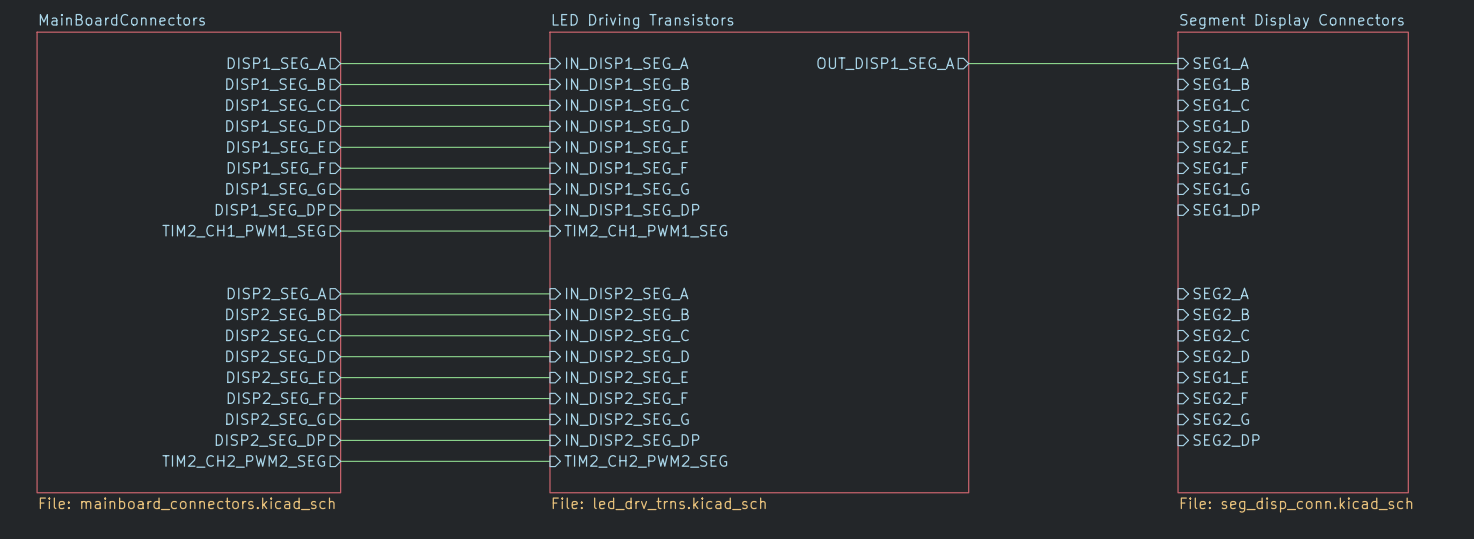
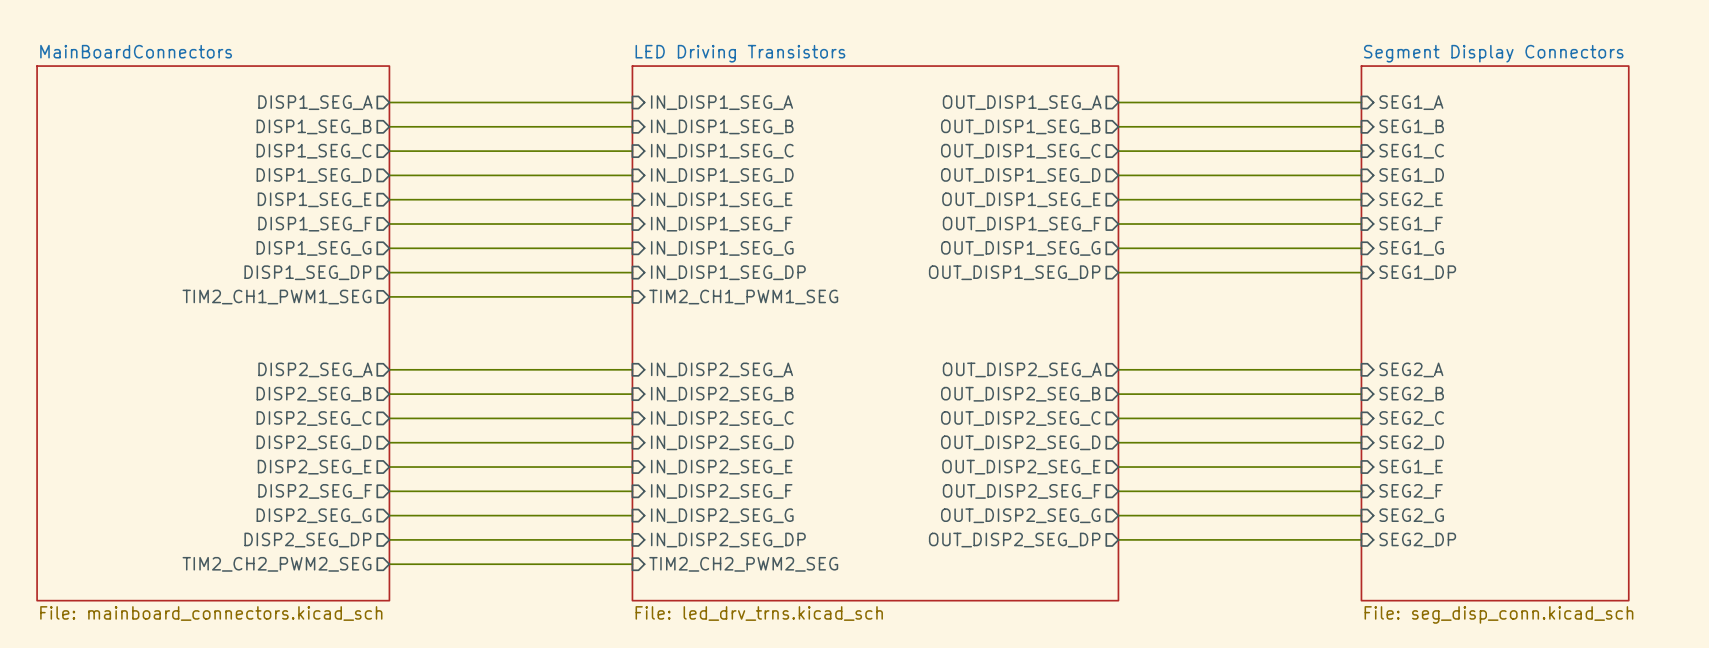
sheet pin: none -> OUT_DISP1_SEG_B (1020, 126)
wire: none -> (1118, 126) (1361, 126)
sheet pin: none -> OUT_DISP1_SEG_C (1020, 151)
wire: none -> (1118, 151) (1361, 151)
sheet pin: none -> OUT_DISP1_SEG_D (1020, 175)
wire: none -> (1118, 175) (1361, 175)
sheet pin: none -> OUT_DISP1_SEG_E (1021, 199)
wire: none -> (1118, 199) (1361, 199)
sheet pin: none -> OUT_DISP1_SEG_F (1021, 224)
wire: none -> (1118, 224) (1361, 224)
sheet pin: none -> OUT_DISP1_SEG_G (1020, 248)
wire: none -> (1118, 248) (1361, 248)
sheet pin: none -> OUT_DISP1_SEG_DP (1014, 272)
wire: none -> (1118, 272) (1361, 272)
sheet pin: none -> OUT_DISP2_SEG_A (1022, 369)
wire: none -> (1118, 369) (1361, 369)
sheet pin: none -> OUT_DISP2_SEG_B (1020, 394)
wire: none -> (1118, 394) (1361, 394)
sheet pin: none -> OUT_DISP2_SEG_C (1020, 418)
wire: none -> (1118, 418) (1361, 418)
sheet pin: none -> OUT_DISP2_SEG_D (1020, 442)
wire: none -> (1118, 442) (1361, 442)
sheet pin: none -> OUT_DISP2_SEG_E (1021, 467)
wire: none -> (1118, 467) (1361, 467)
sheet pin: none -> OUT_DISP2_SEG_F (1021, 491)
wire: none -> (1118, 491) (1361, 491)
sheet pin: none -> OUT_DISP2_SEG_G (1020, 515)
wire: none -> (1118, 515) (1361, 515)
sheet pin: none -> OUT_DISP2_SEG_DP (1014, 540)
wire: none -> (1118, 539) (1361, 539)

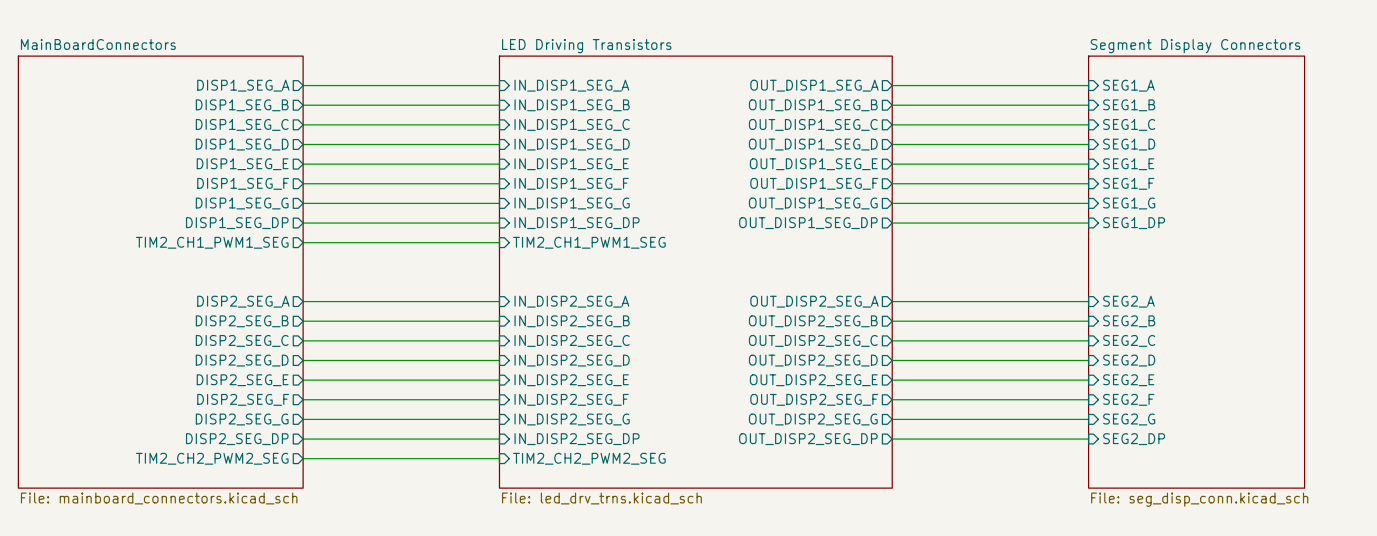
sheet pin: SEG2_E (1411, 199) -> SEG1_E (1128, 164)
sheet pin: SEG1_E (1411, 467) -> SEG2_E (1128, 380)

